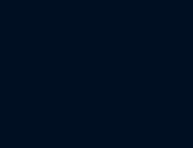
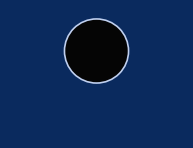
part: none -> (96, 50)

